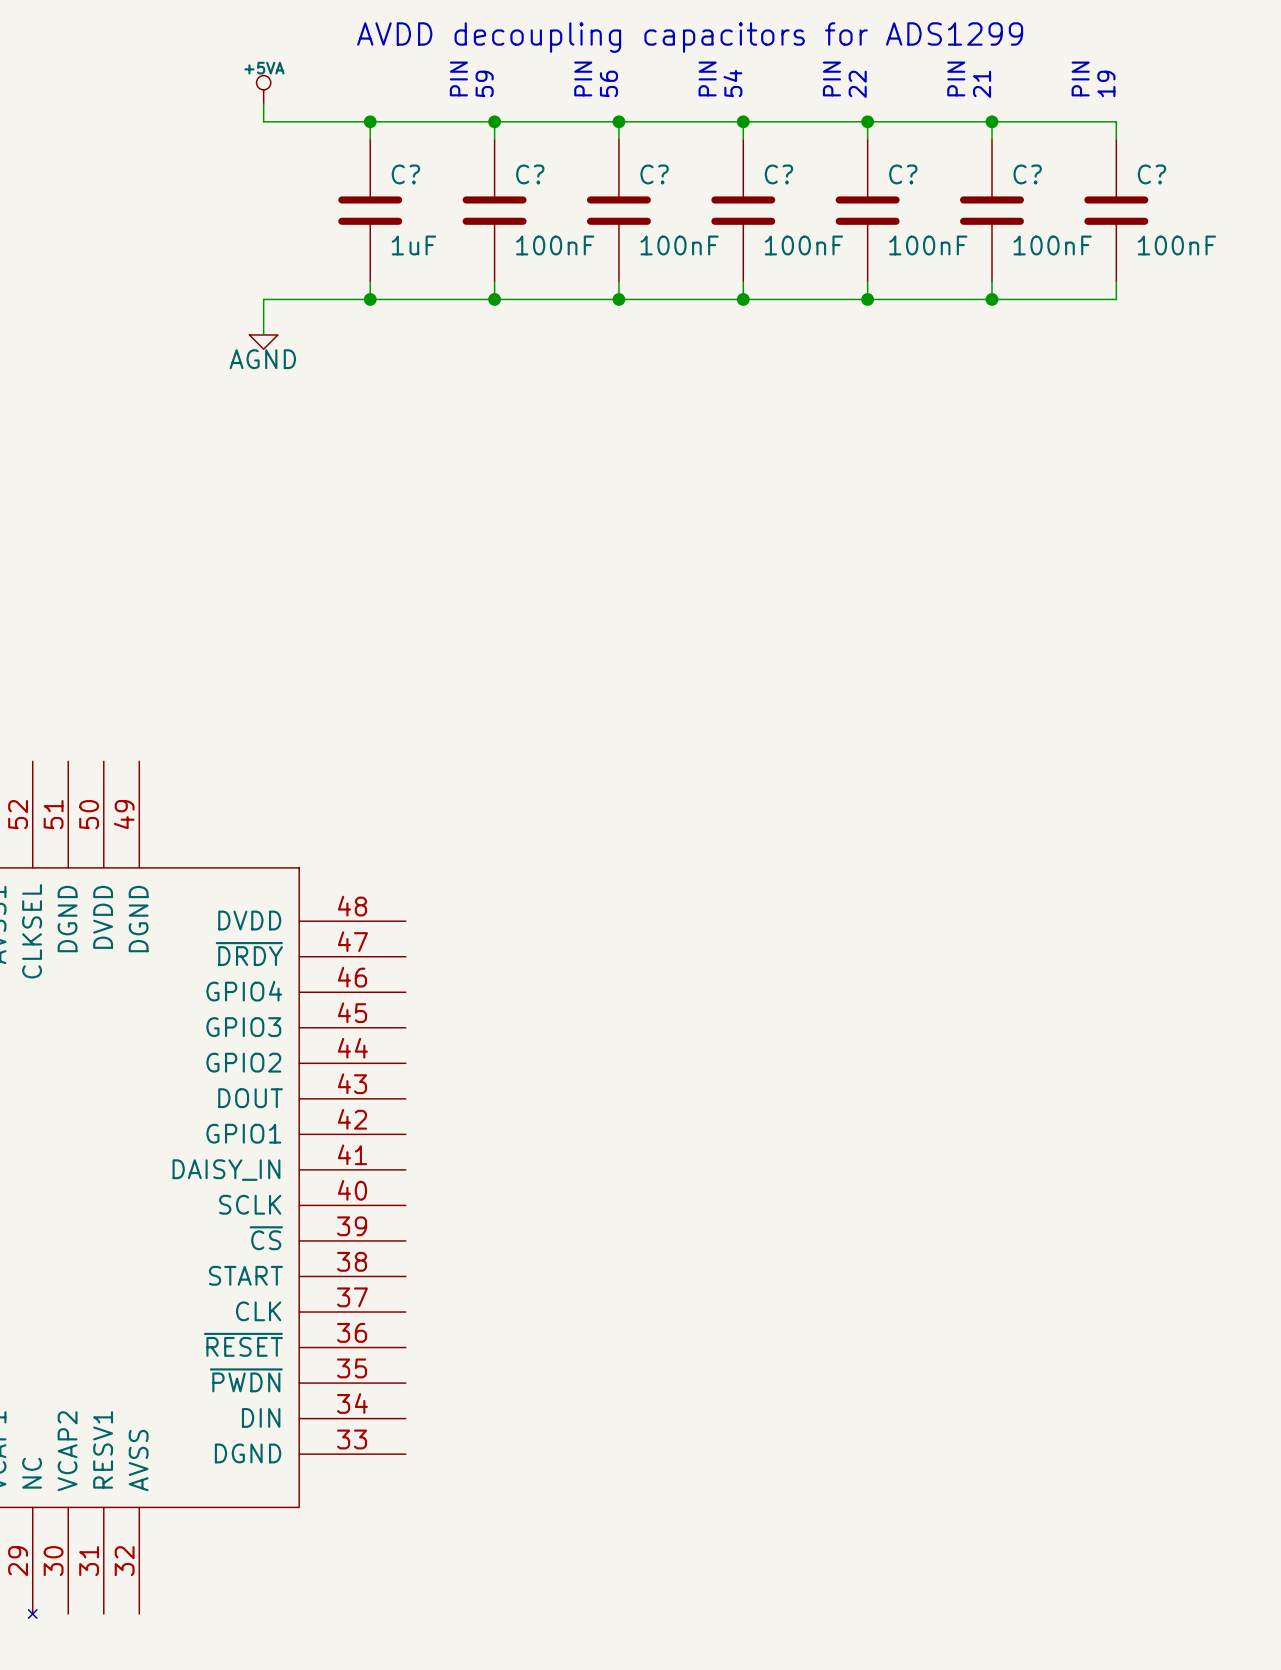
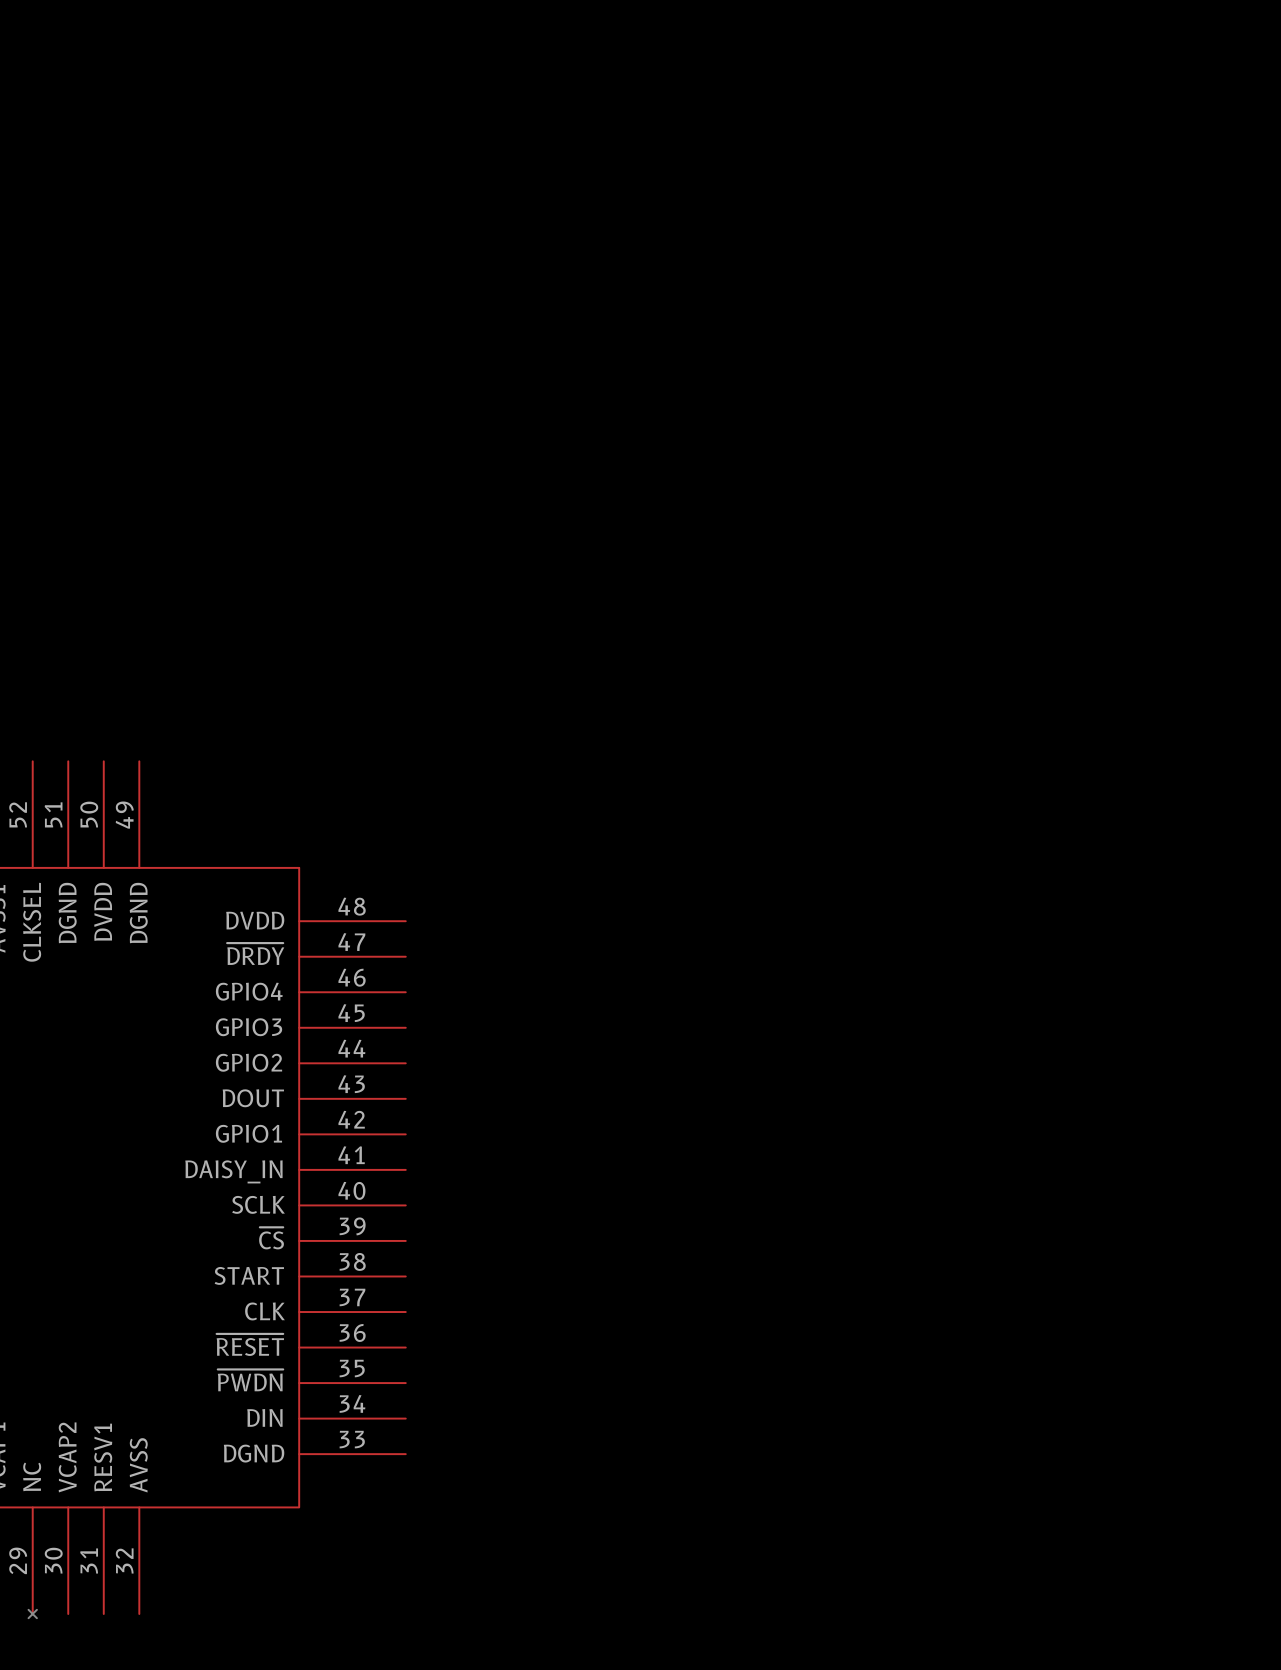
text: AVDD decoupling capacitors for ADS1299 (690, 37) -> none
text: PIN (458, 78) -> none
text: PIN (583, 78) -> none
text: PIN (707, 78) -> none
text: PIN (831, 78) -> none
text: PIN (956, 78) -> none
text: PIN (1080, 78) -> none
text: 59 (484, 83) -> none
text: 56 (608, 83) -> none
text: 54 (732, 83) -> none
text: 19 (1106, 83) -> none
text: 22 (857, 84) -> none
text: 21 (982, 84) -> none
power symbol: +5VA (263, 89) -> none
wire: (263, 104) (263, 121) (1116, 121) (1116, 139) -> none
wire: (370, 121) (370, 139) -> none
junction: (370, 121) -> none
wire: (494, 121) (494, 139) -> none
junction: (494, 121) -> none
wire: (618, 121) (618, 139) -> none
junction: (618, 121) -> none
wire: (743, 121) (743, 139) -> none
junction: (743, 121) -> none
wire: (867, 121) (867, 139) -> none
junction: (867, 121) -> none
wire: (991, 121) (991, 139) -> none
junction: (991, 121) -> none
C?: 1uF (370, 210) -> none
C?: 100nF (494, 210) -> none
C?: 100nF (618, 210) -> none
C?: 100nF (743, 210) -> none
C?: 100nF (867, 210) -> none
C?: 100nF (991, 210) -> none
C?: 100nF (1116, 210) -> none
wire: (370, 281) (370, 299) -> none
wire: (494, 281) (494, 299) -> none
wire: (618, 281) (618, 299) -> none
wire: (743, 281) (743, 299) -> none
wire: (867, 281) (867, 299) -> none
wire: (991, 281) (991, 299) -> none
wire: (1116, 281) (1116, 299) (263, 299) (263, 334) -> none
junction: (370, 299) -> none
junction: (494, 299) -> none
junction: (618, 299) -> none
junction: (743, 299) -> none
junction: (867, 299) -> none
junction: (991, 299) -> none
power symbol: AGND (263, 342) -> none

